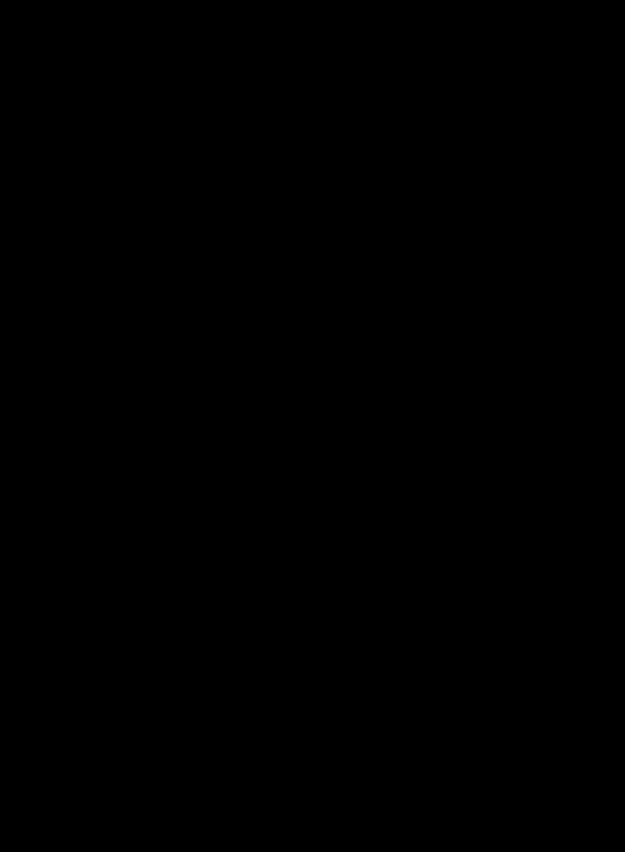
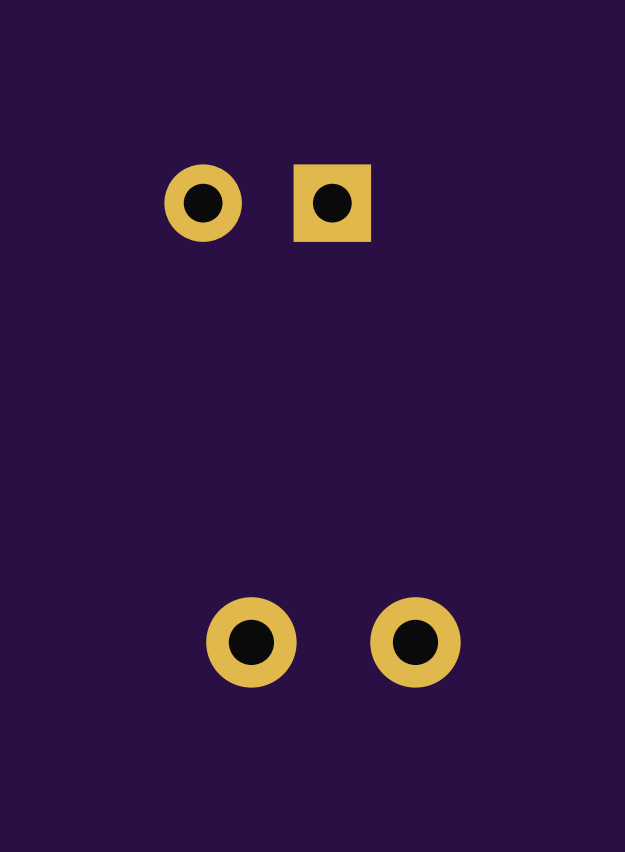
part: none -> (267, 203)
part: none -> (333, 642)

